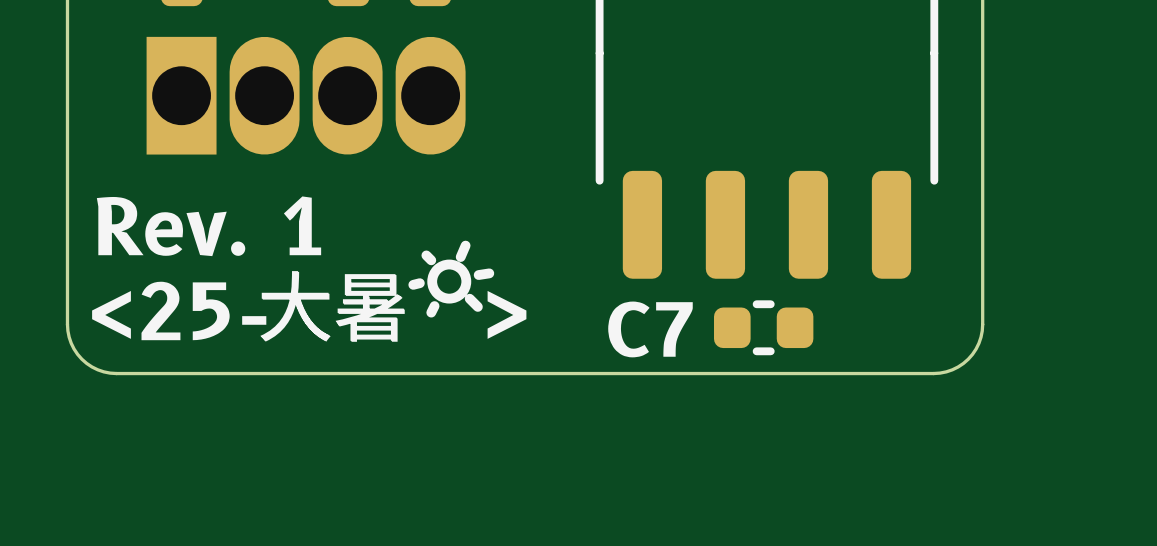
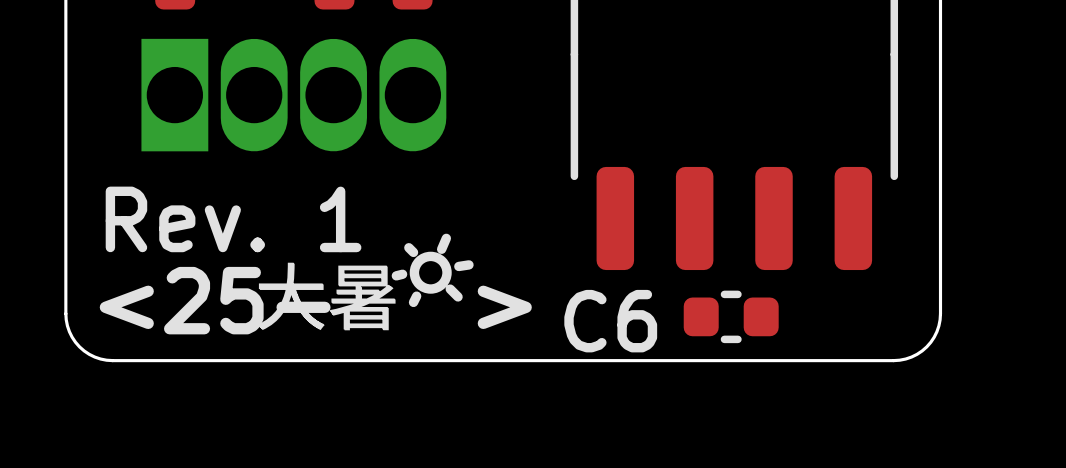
C7 name: C7 (650, 329) -> C6 (610, 321)

